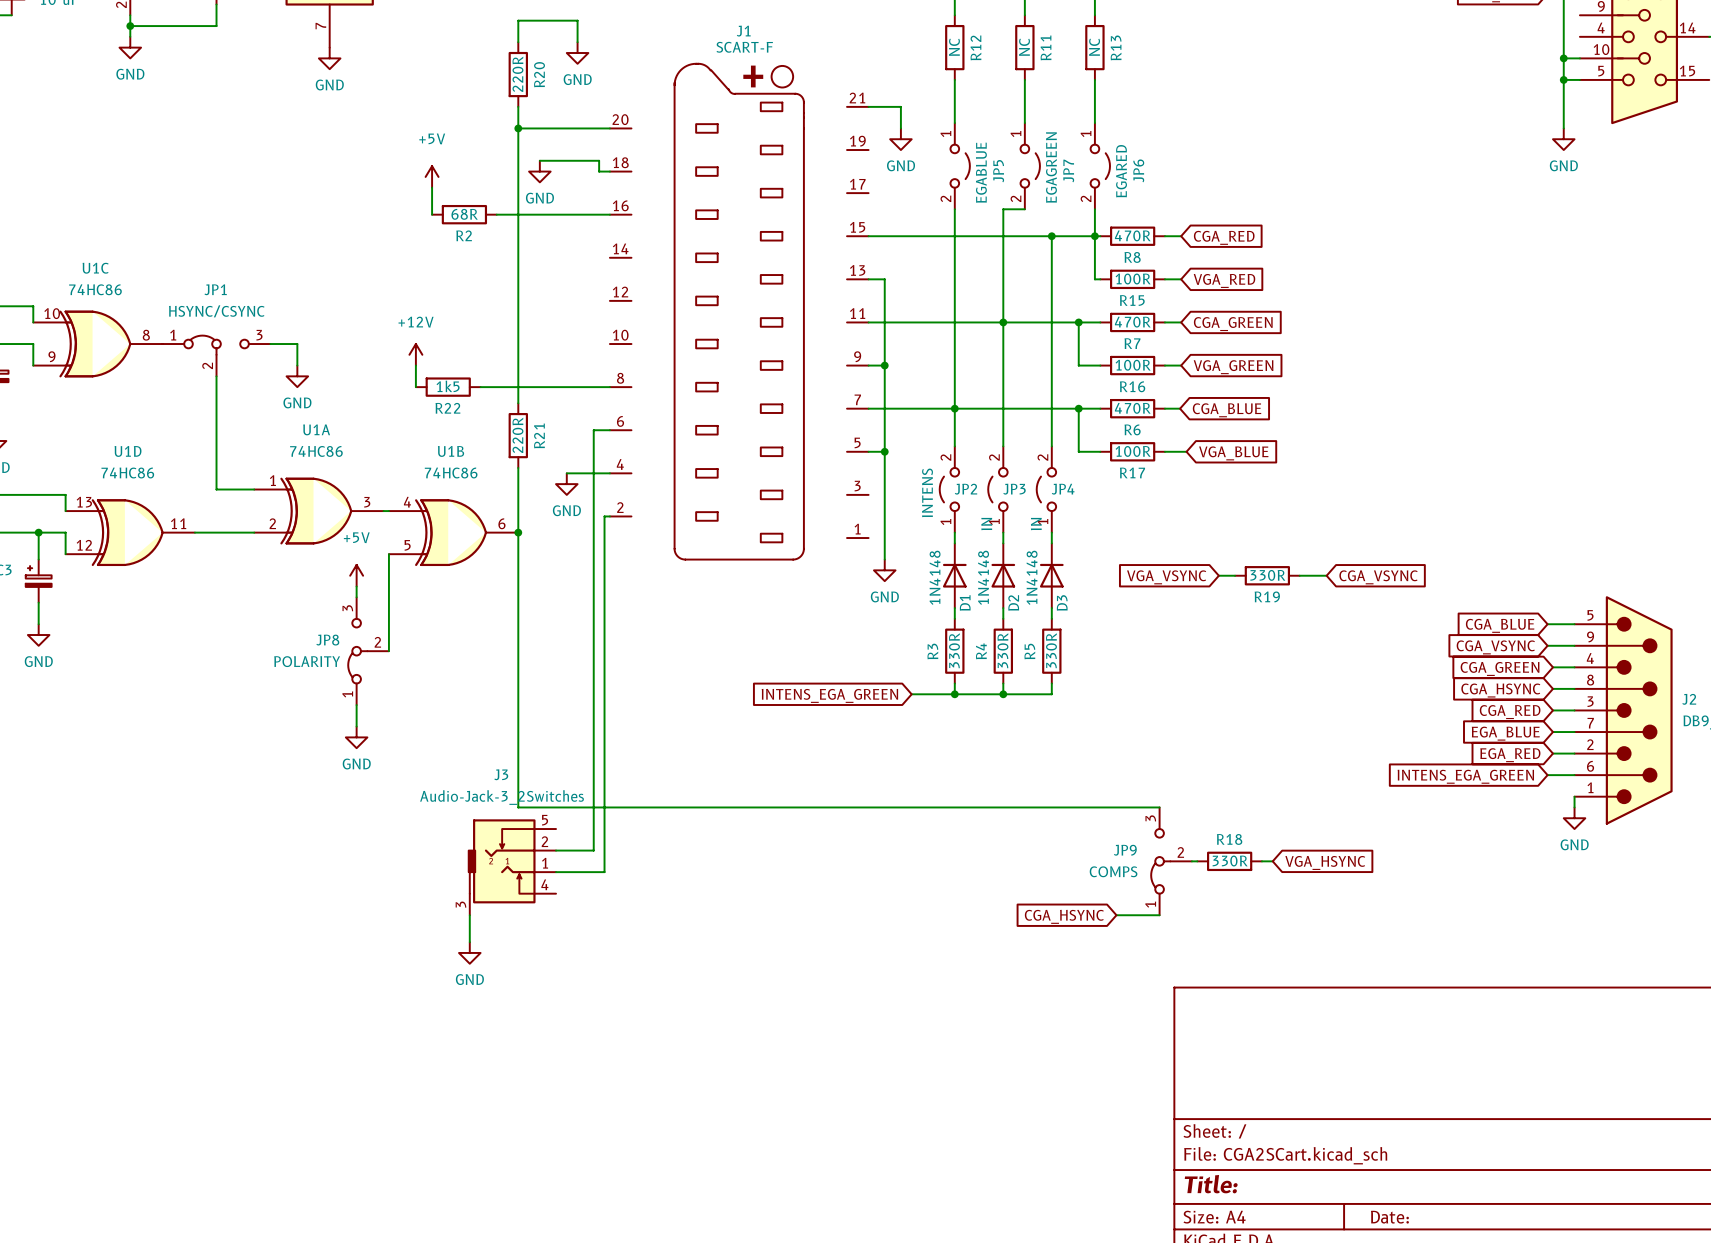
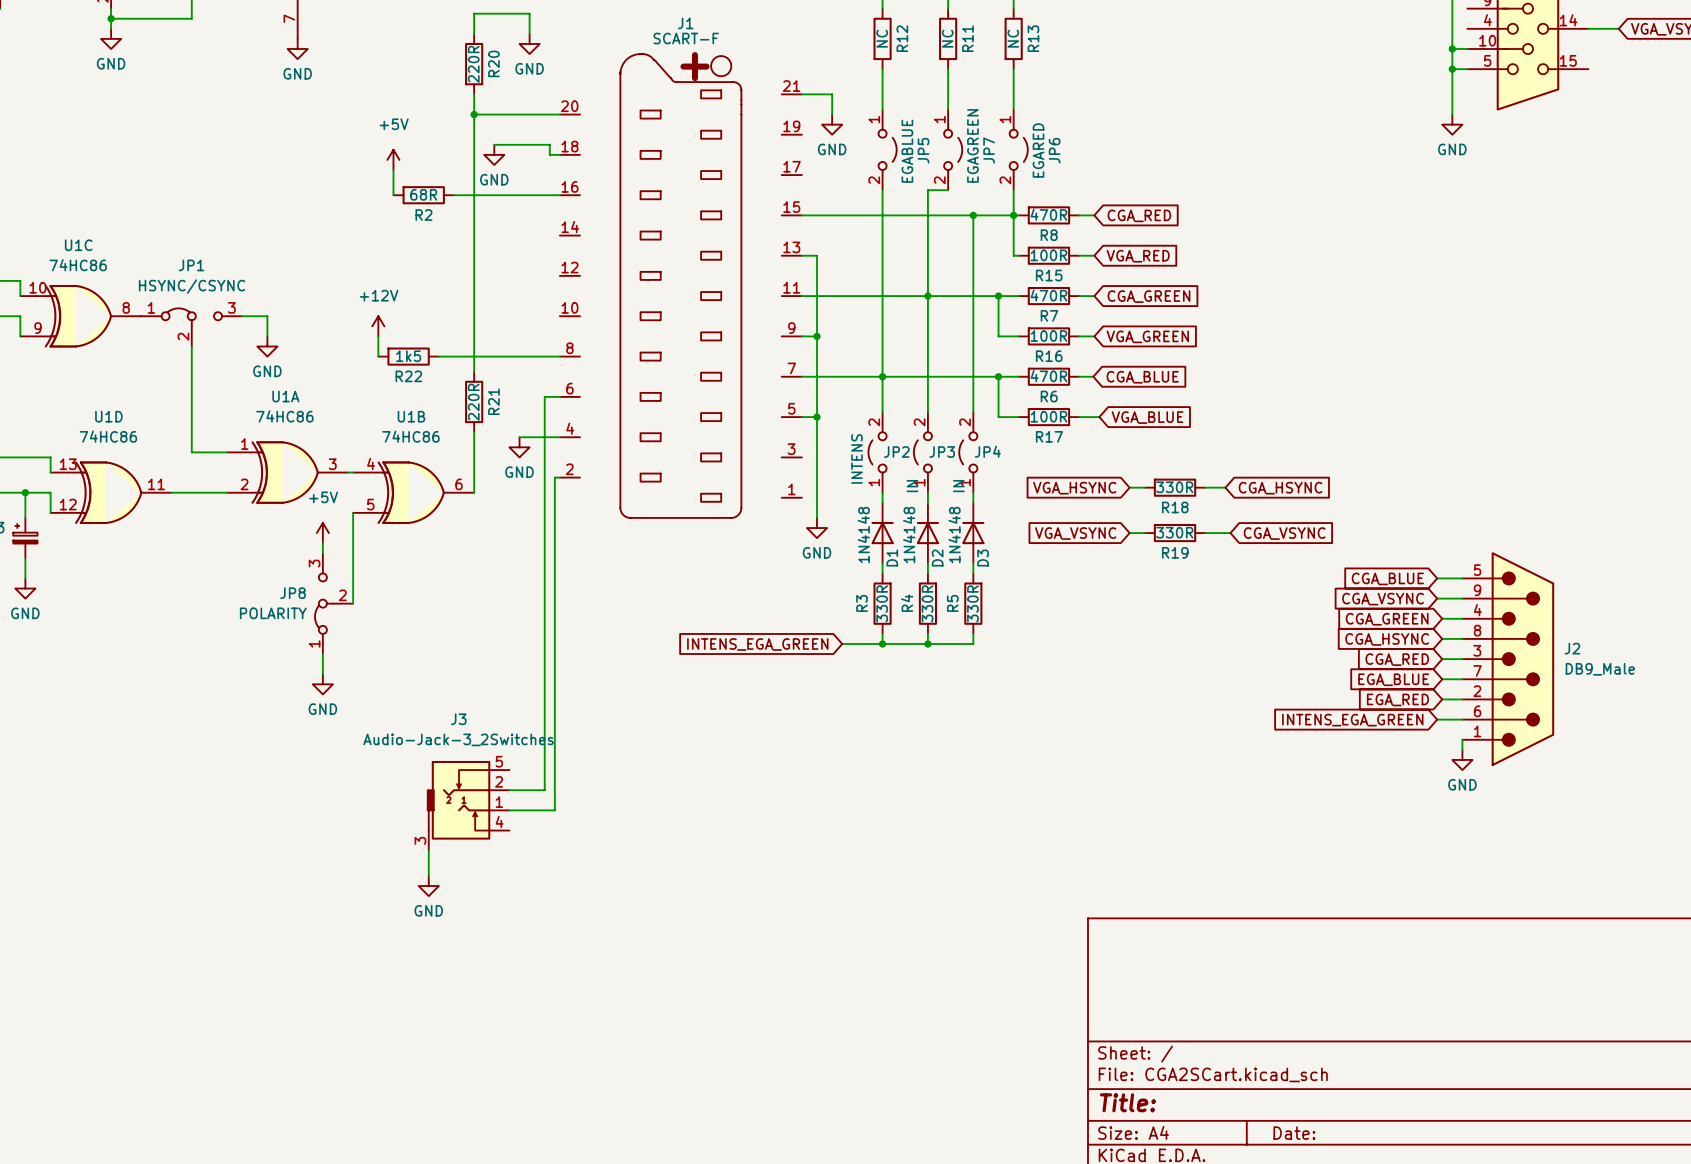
wire: none -> (1129, 487) (1144, 487)
wire: none -> (1205, 487) (1225, 487)
global label: none -> VGA_HSYNC (1074, 488)
global label: none -> CGA_HSYNC (1280, 488)
wire: (518, 532) (518, 807) (1159, 807) -> none
junction: (518, 532) -> none
R18 name position: R18 (1229, 839) -> R18 (1175, 507)
JP9: COMPS (1171, 861) -> none
wire: (1191, 861) (1197, 861) -> none
R18 position: (1229, 861) -> (1175, 487)
wire: (1261, 861) (1272, 861) -> none
global label: VGA_HSYNC (1325, 862) -> none
wire: (1116, 915) (1159, 915) -> none
global label: CGA_HSYNC (1064, 916) -> none

